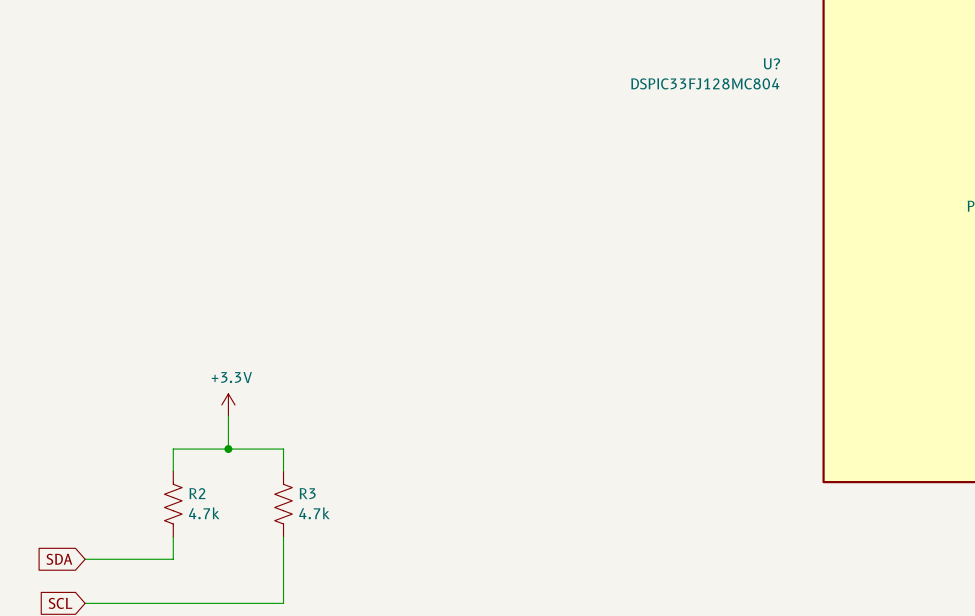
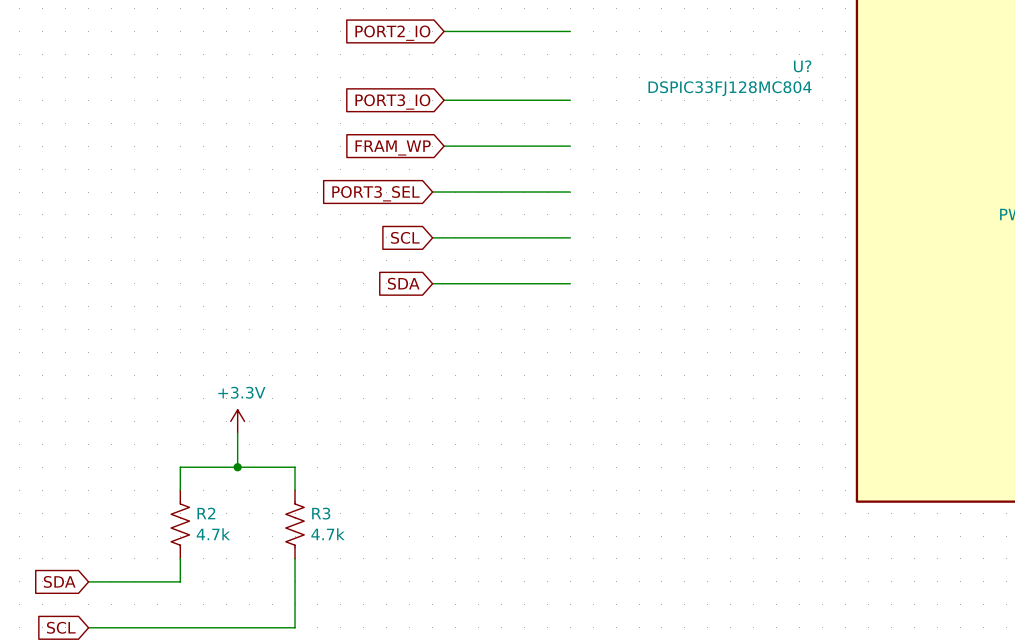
wire: none -> (444, 31) (570, 31)
global label: none -> PORT2_IO (392, 33)
wire: none -> (444, 100) (570, 100)
global label: none -> PORT3_IO (392, 102)
wire: none -> (444, 146) (570, 146)
global label: none -> FRAM_WP (393, 147)
wire: none -> (432, 192) (570, 192)
global label: none -> PORT3_SEL (375, 193)
global label: none -> SCL (405, 237)
wire: none -> (432, 237) (570, 237)
global label: none -> SDA (403, 283)
wire: none -> (432, 283) (570, 283)

